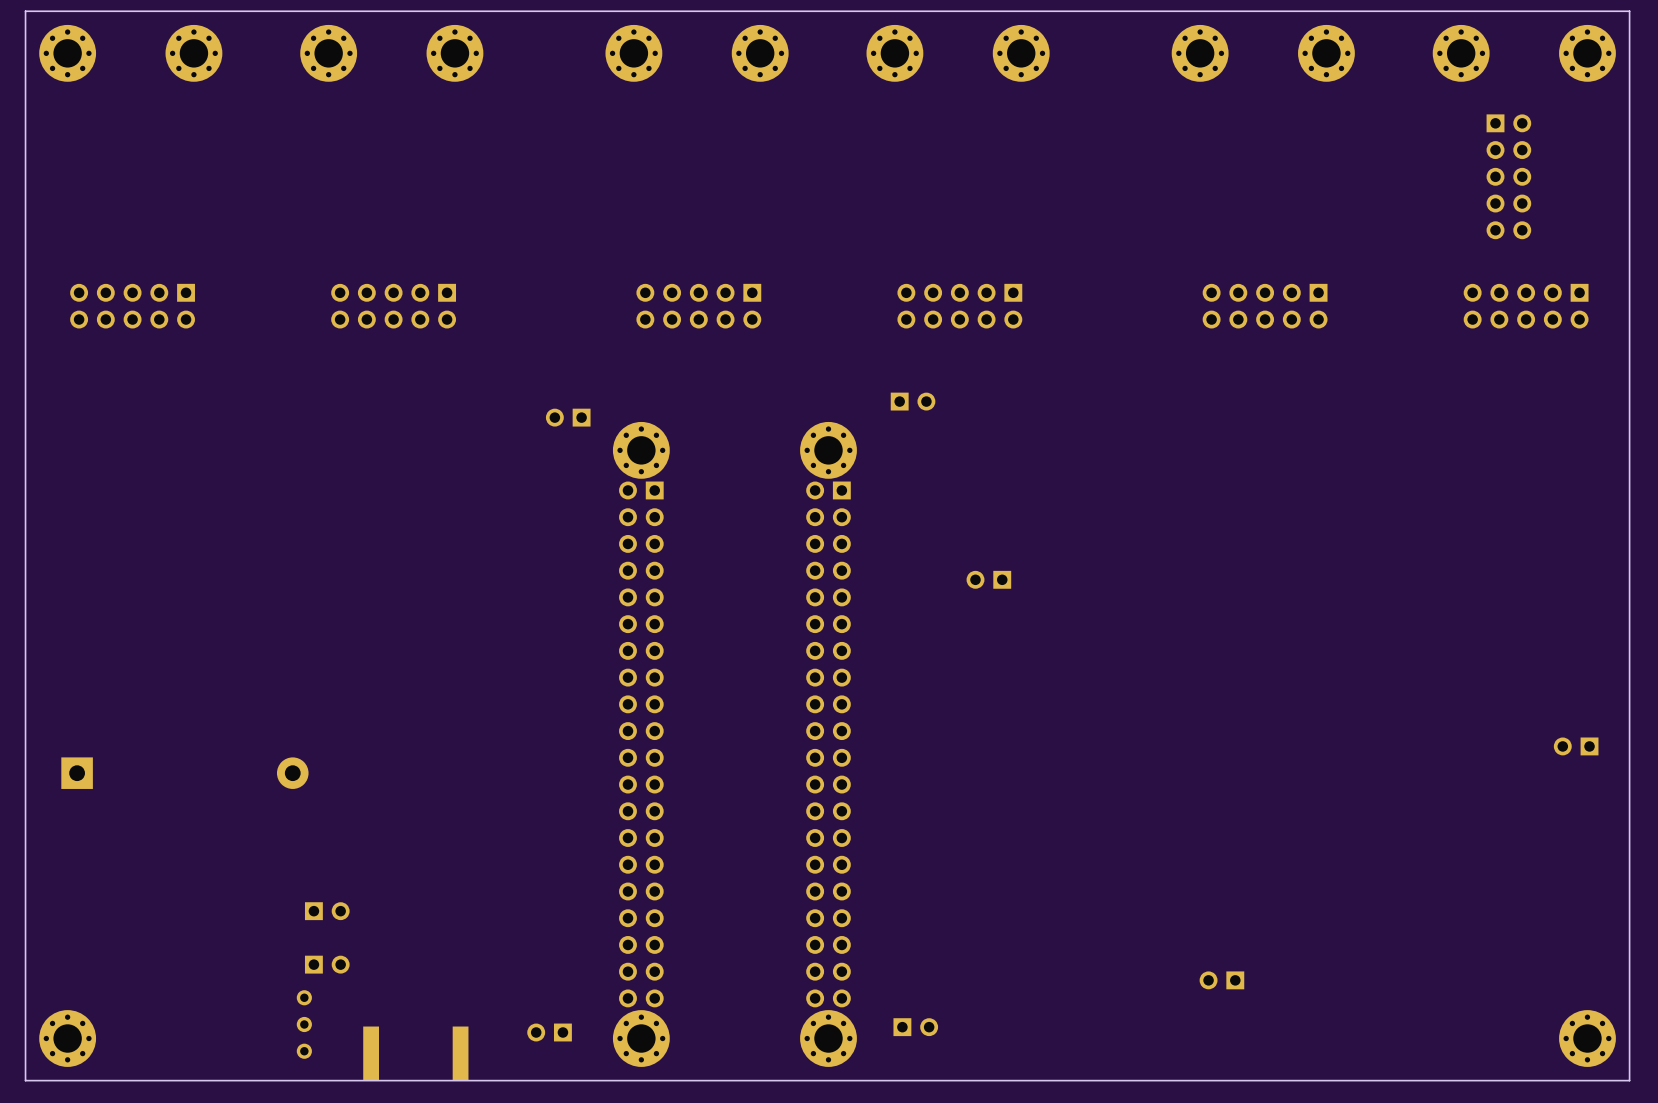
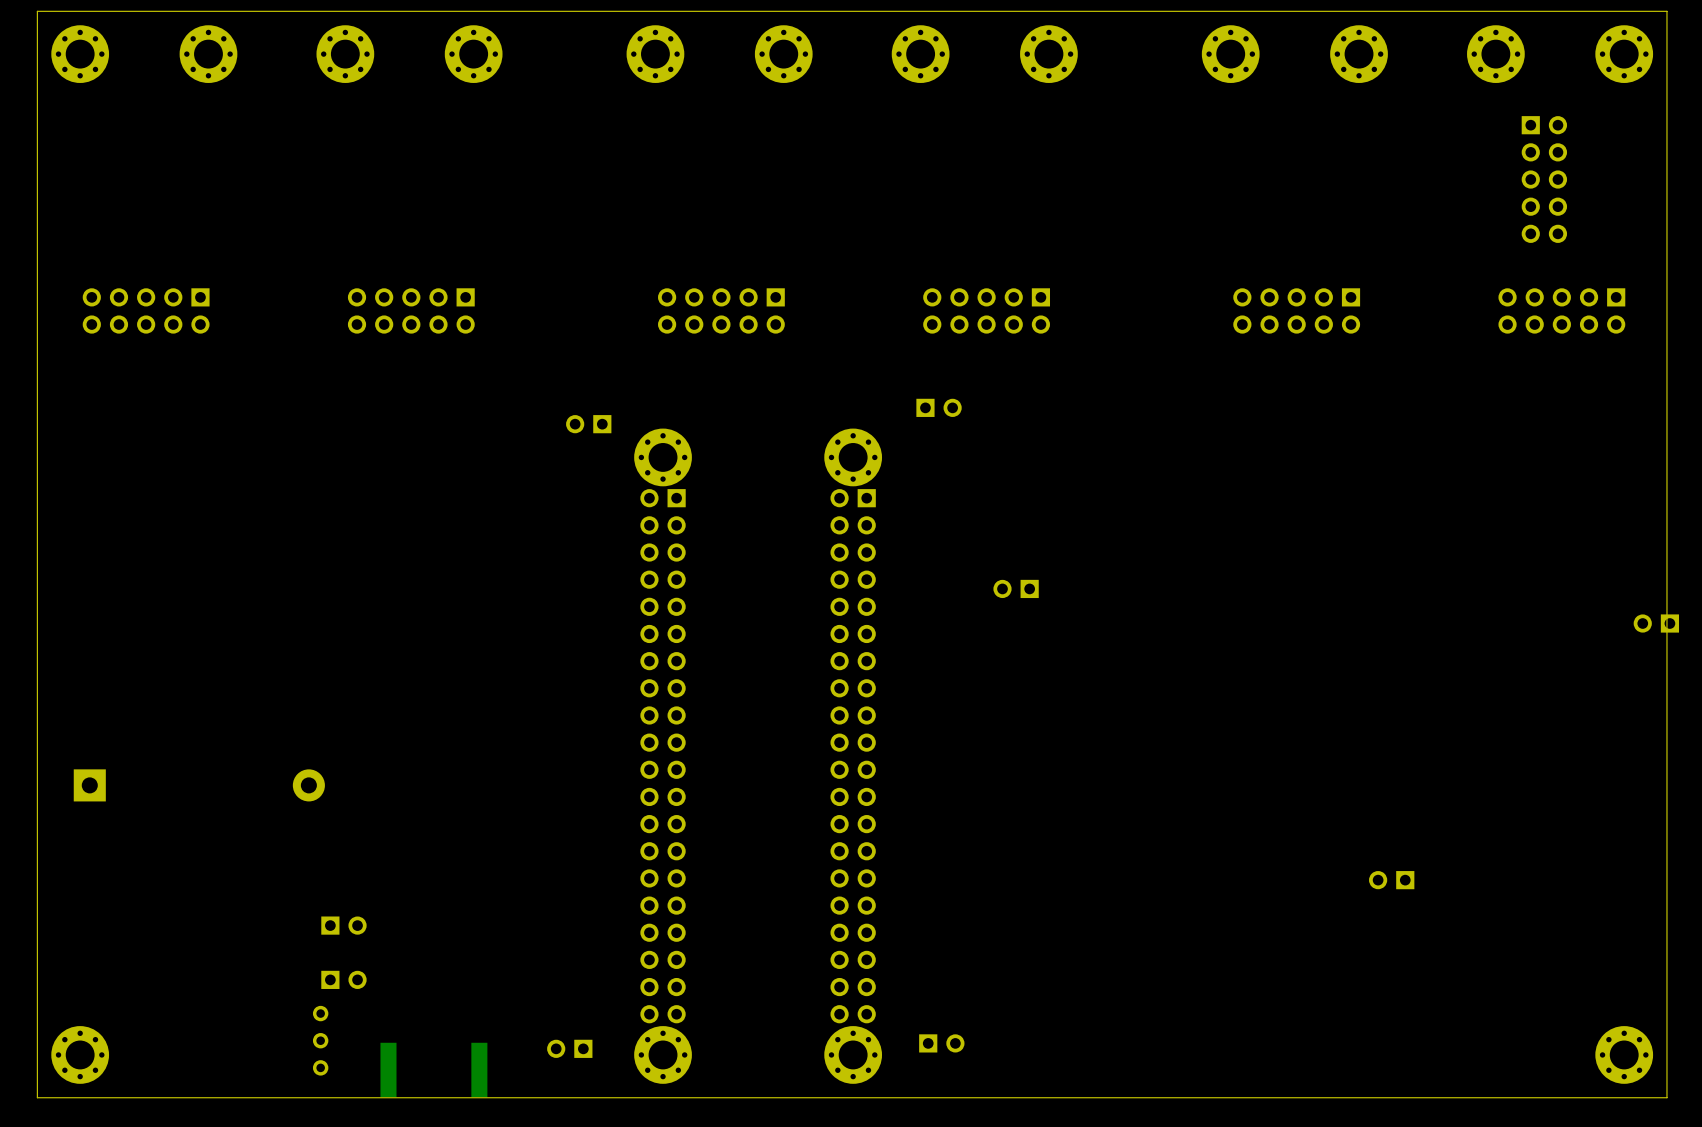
part: none -> (1656, 623)
part: (1576, 746) -> none
part: none -> (1391, 880)
part: (1221, 980) -> none

